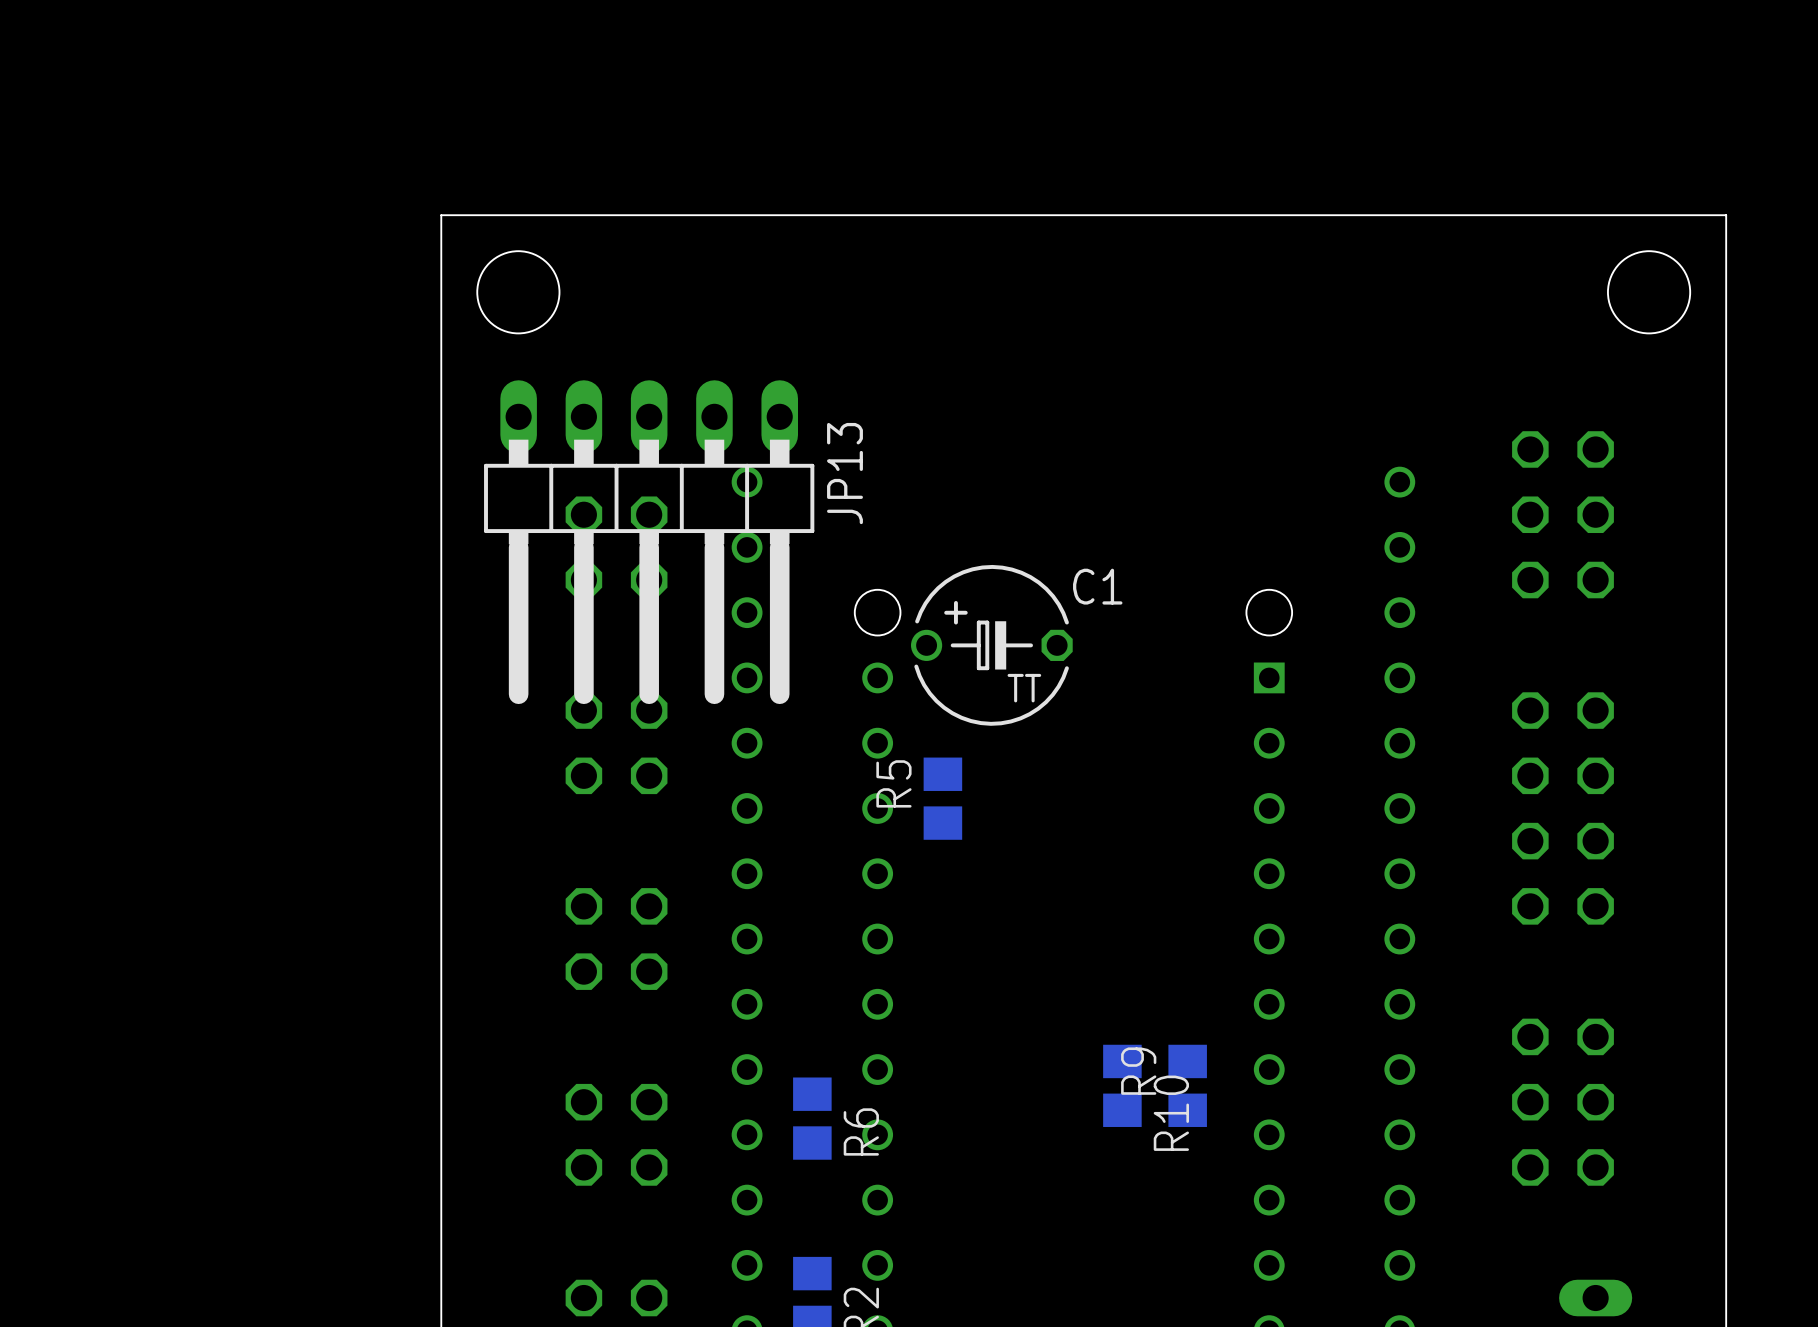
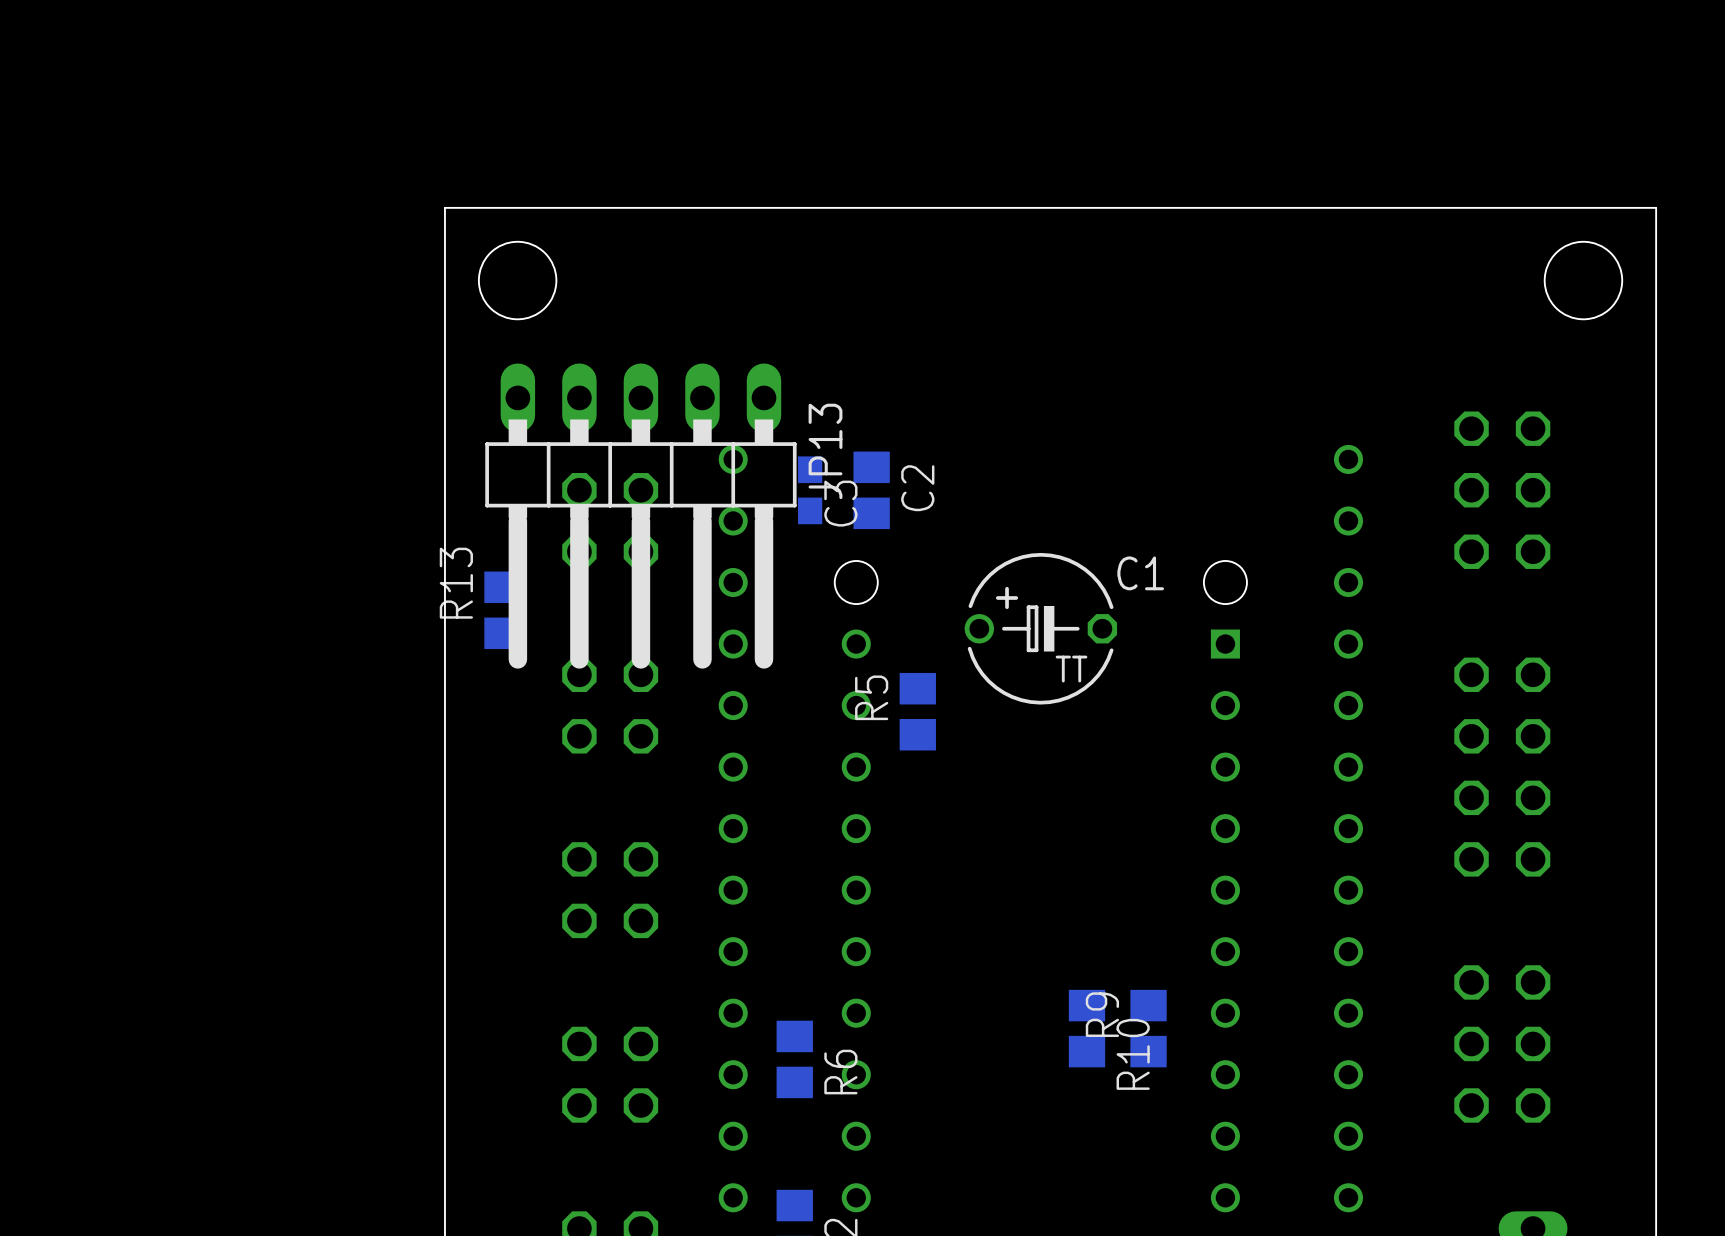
C3: none -> (810, 490)
C2: none -> (871, 490)
R13: none -> (502, 610)
C1 position: (991, 645) -> (1040, 628)
R5 position: (942, 798) -> (917, 711)

